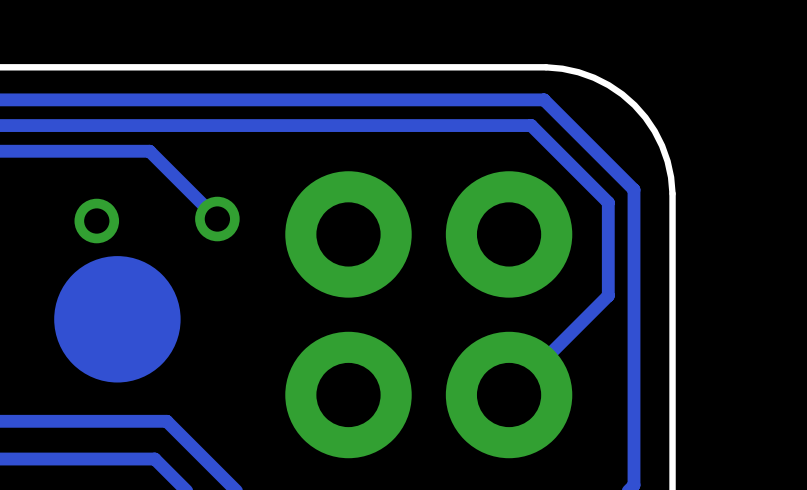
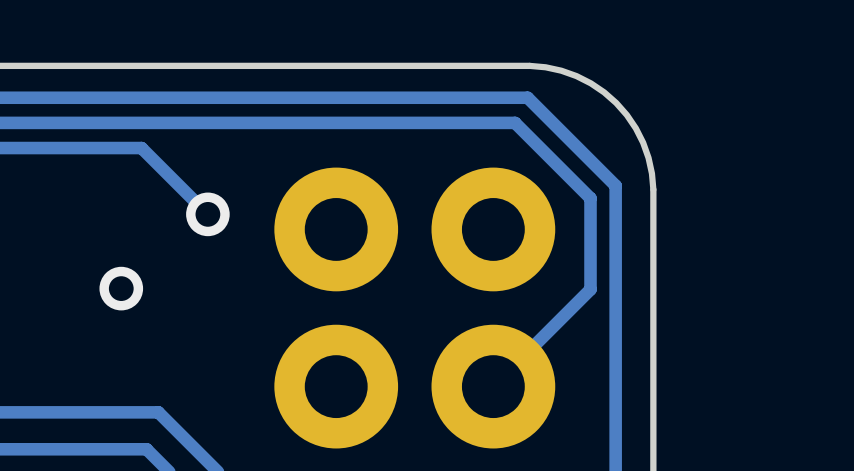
via position: (96, 221) -> (121, 288)
part: (117, 319) -> none

